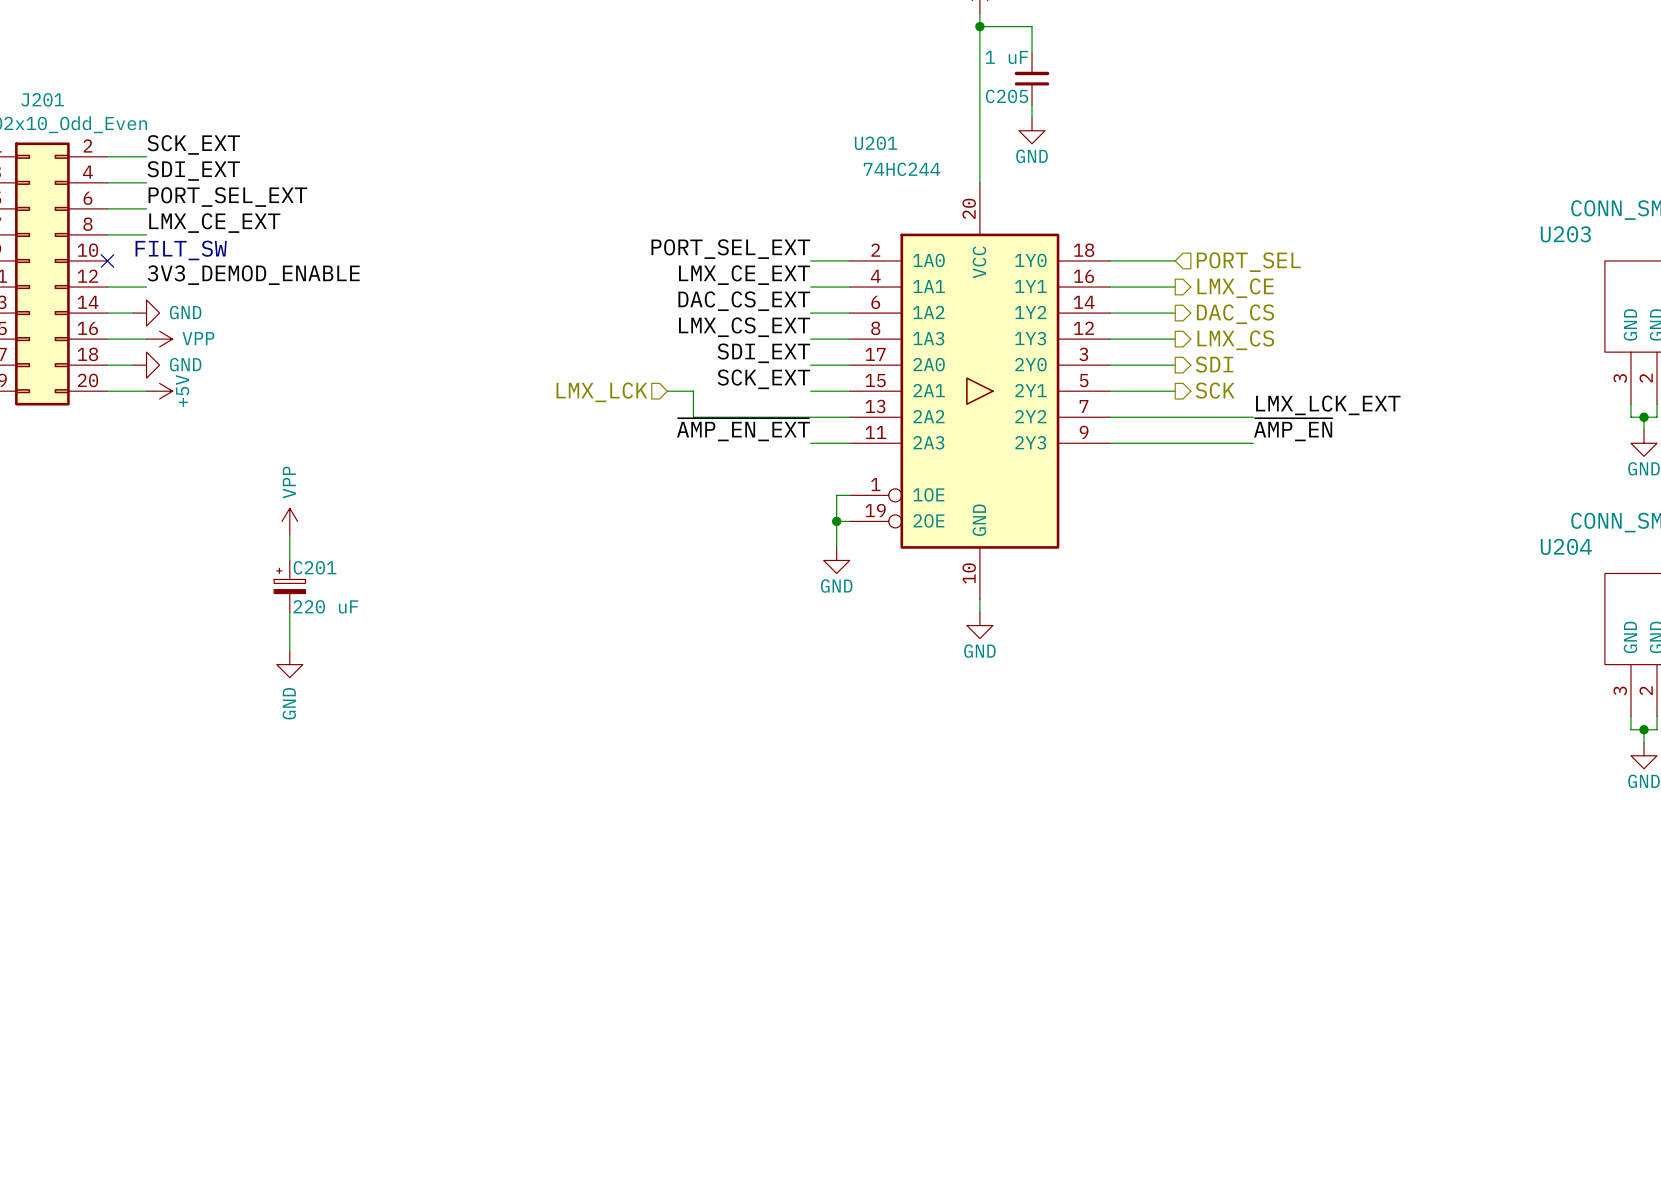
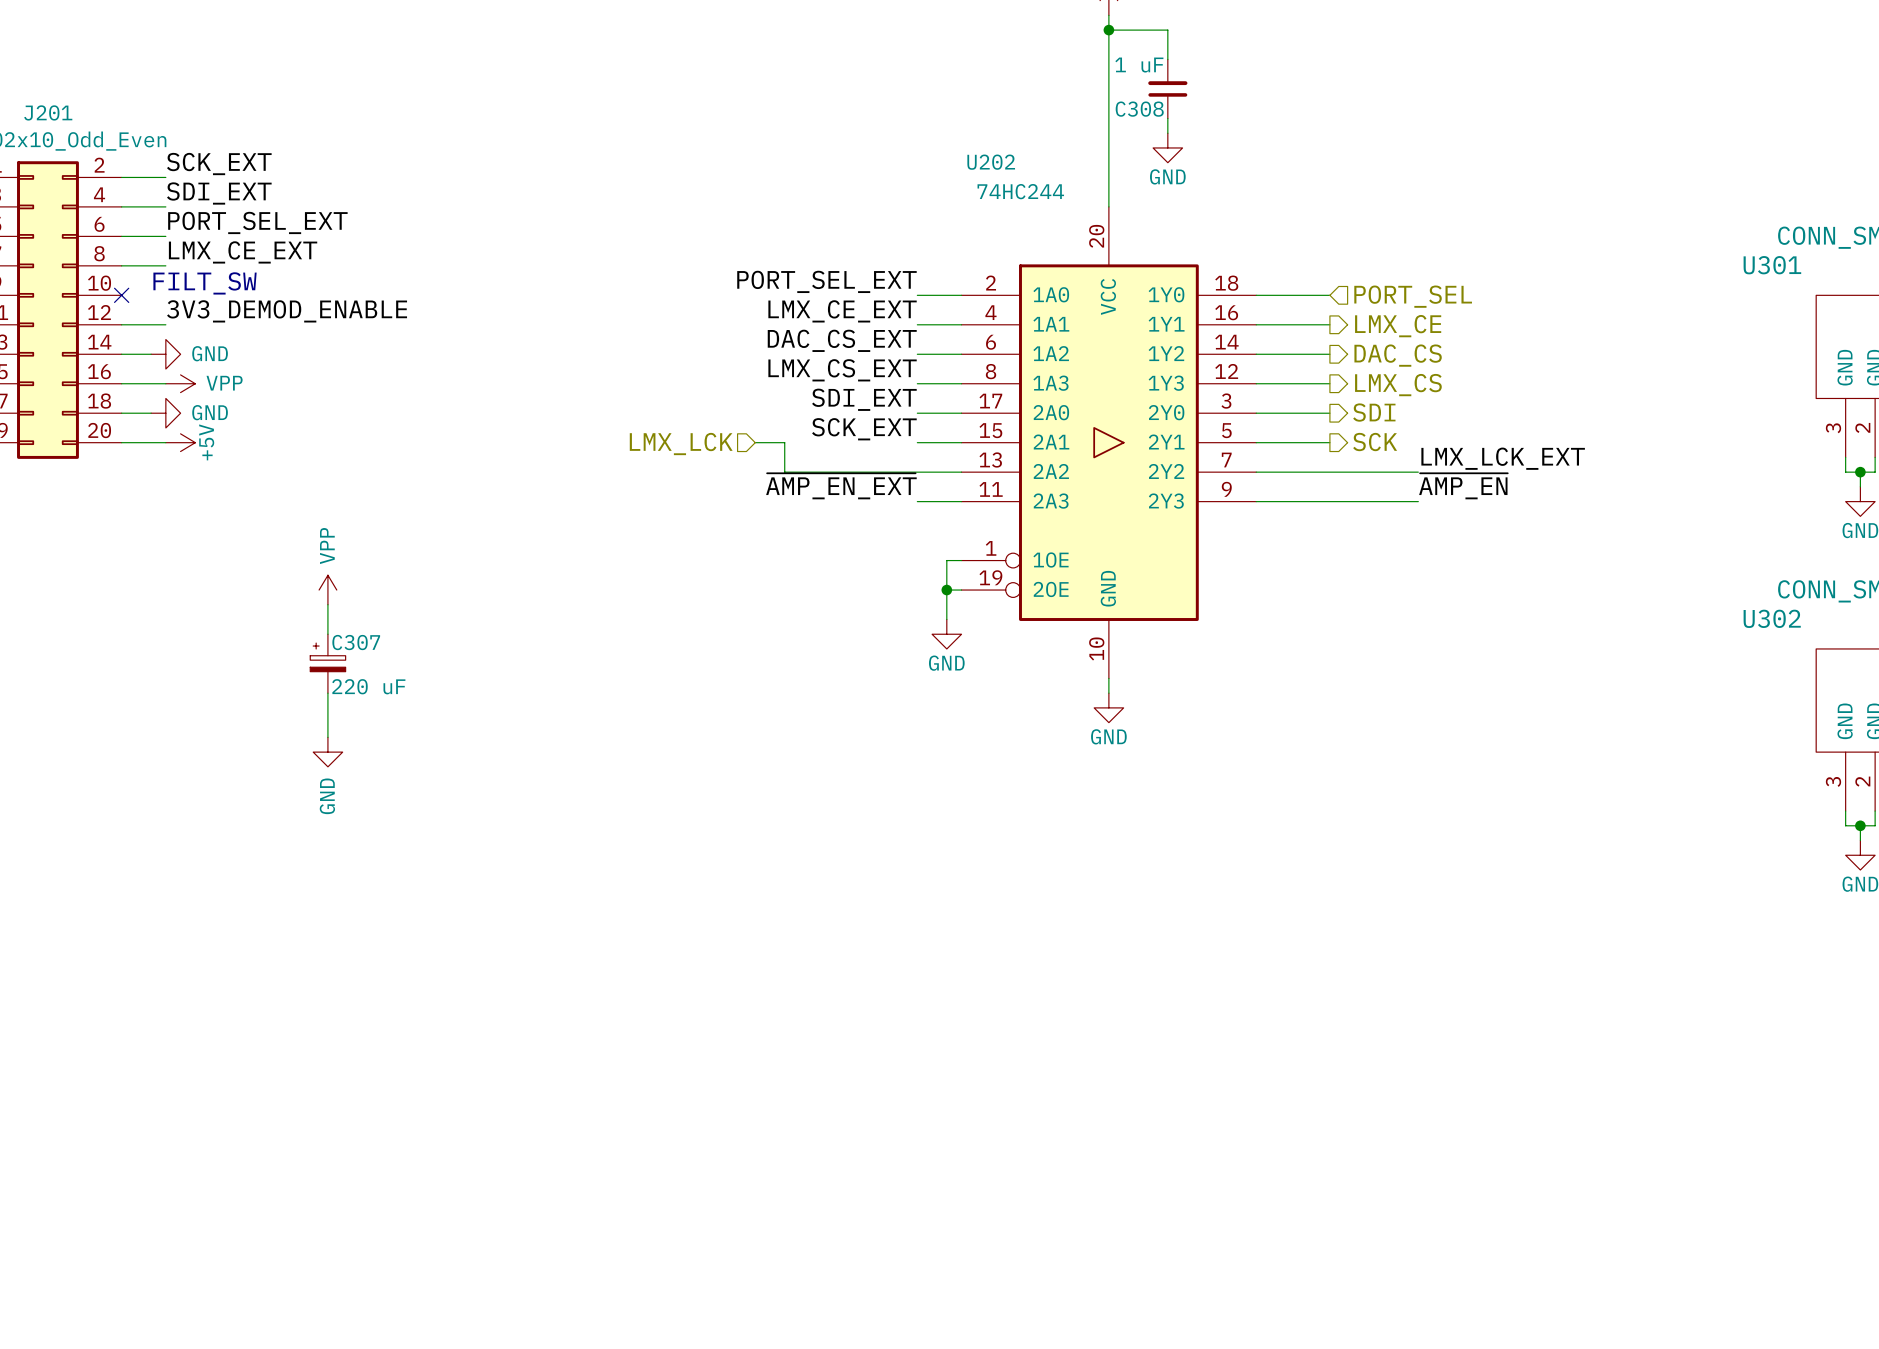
C205 name: C205 (1007, 96) -> C308 (1139, 109)
U201 name: U201 (876, 143) -> U202 (991, 162)
U203 name: U203 (1565, 234) -> U301 (1772, 265)
U204 name: U204 (1566, 546) -> U302 (1772, 618)
C201 name: C201 (315, 567) -> C307 (356, 642)

